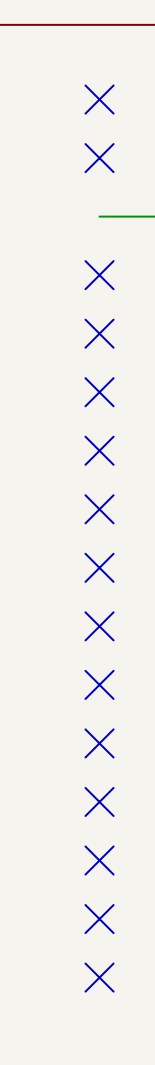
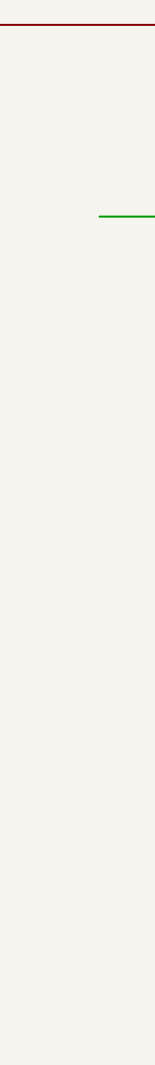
no-connect mark: (99, 99) -> none
no-connect mark: (99, 158) -> none
no-connect mark: (99, 275) -> none
no-connect mark: (99, 333) -> none
no-connect mark: (99, 392) -> none
no-connect mark: (99, 450) -> none
no-connect mark: (99, 509) -> none
no-connect mark: (99, 567) -> none
no-connect mark: (99, 626) -> none
no-connect mark: (99, 684) -> none
no-connect mark: (99, 743) -> none
no-connect mark: (99, 801) -> none
no-connect mark: (99, 860) -> none
no-connect mark: (99, 919) -> none
no-connect mark: (99, 977) -> none

